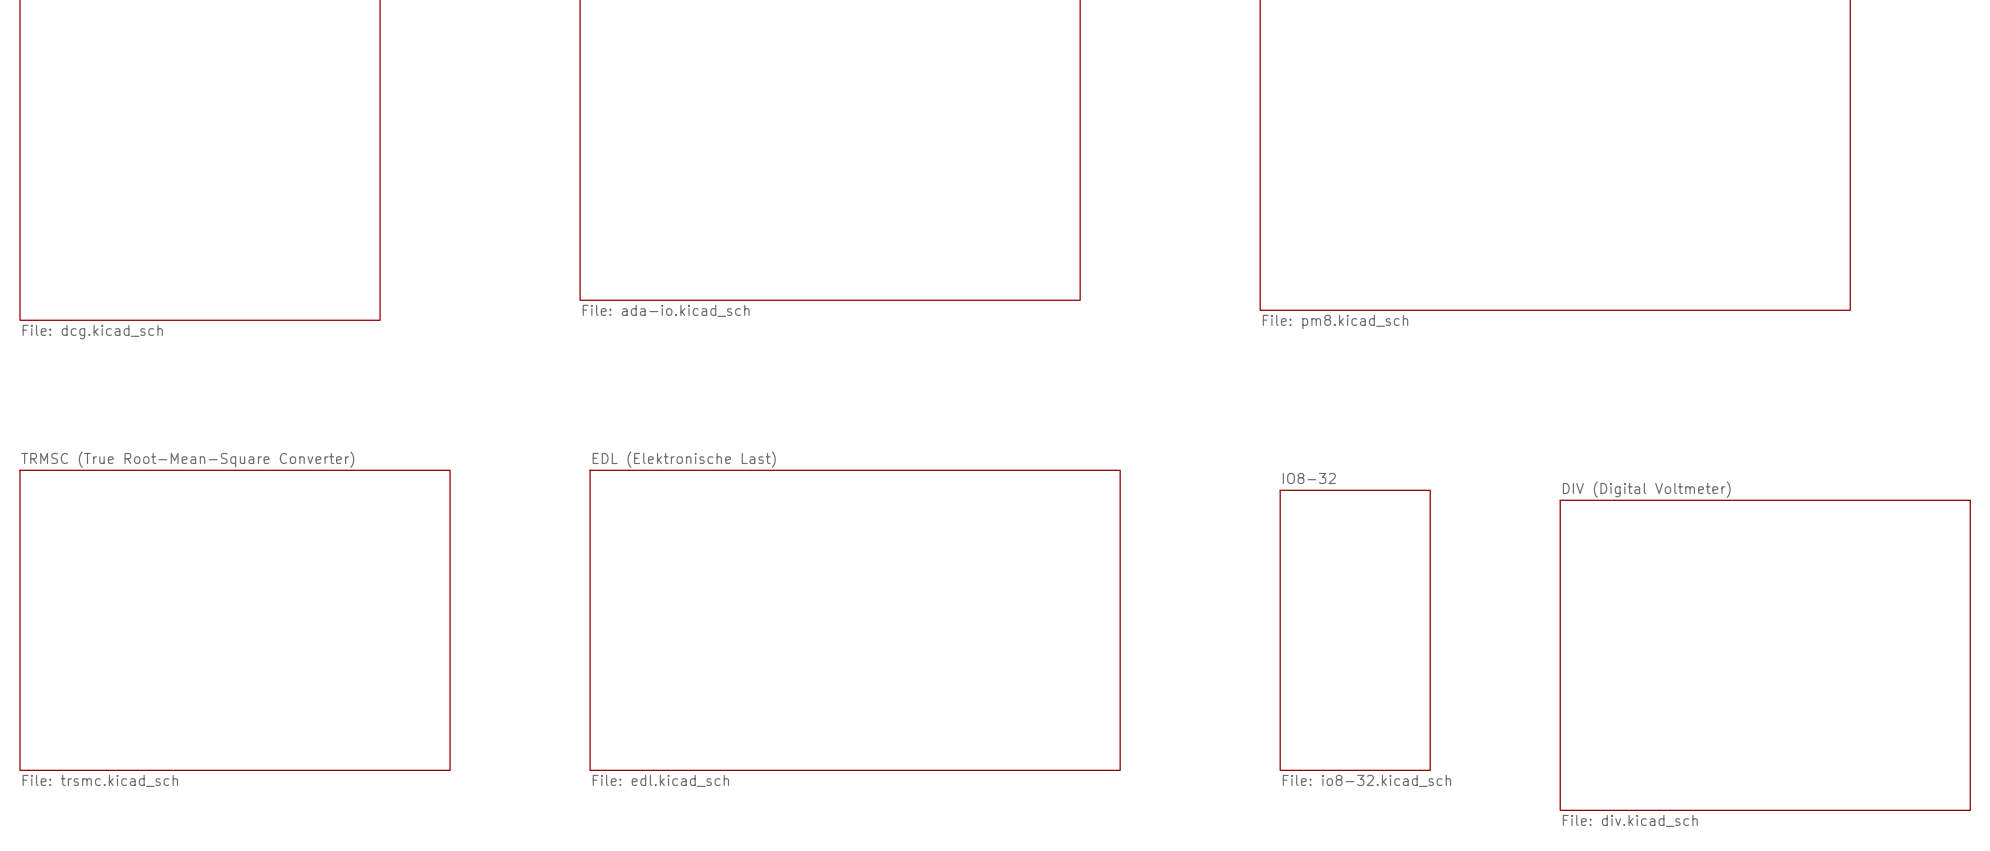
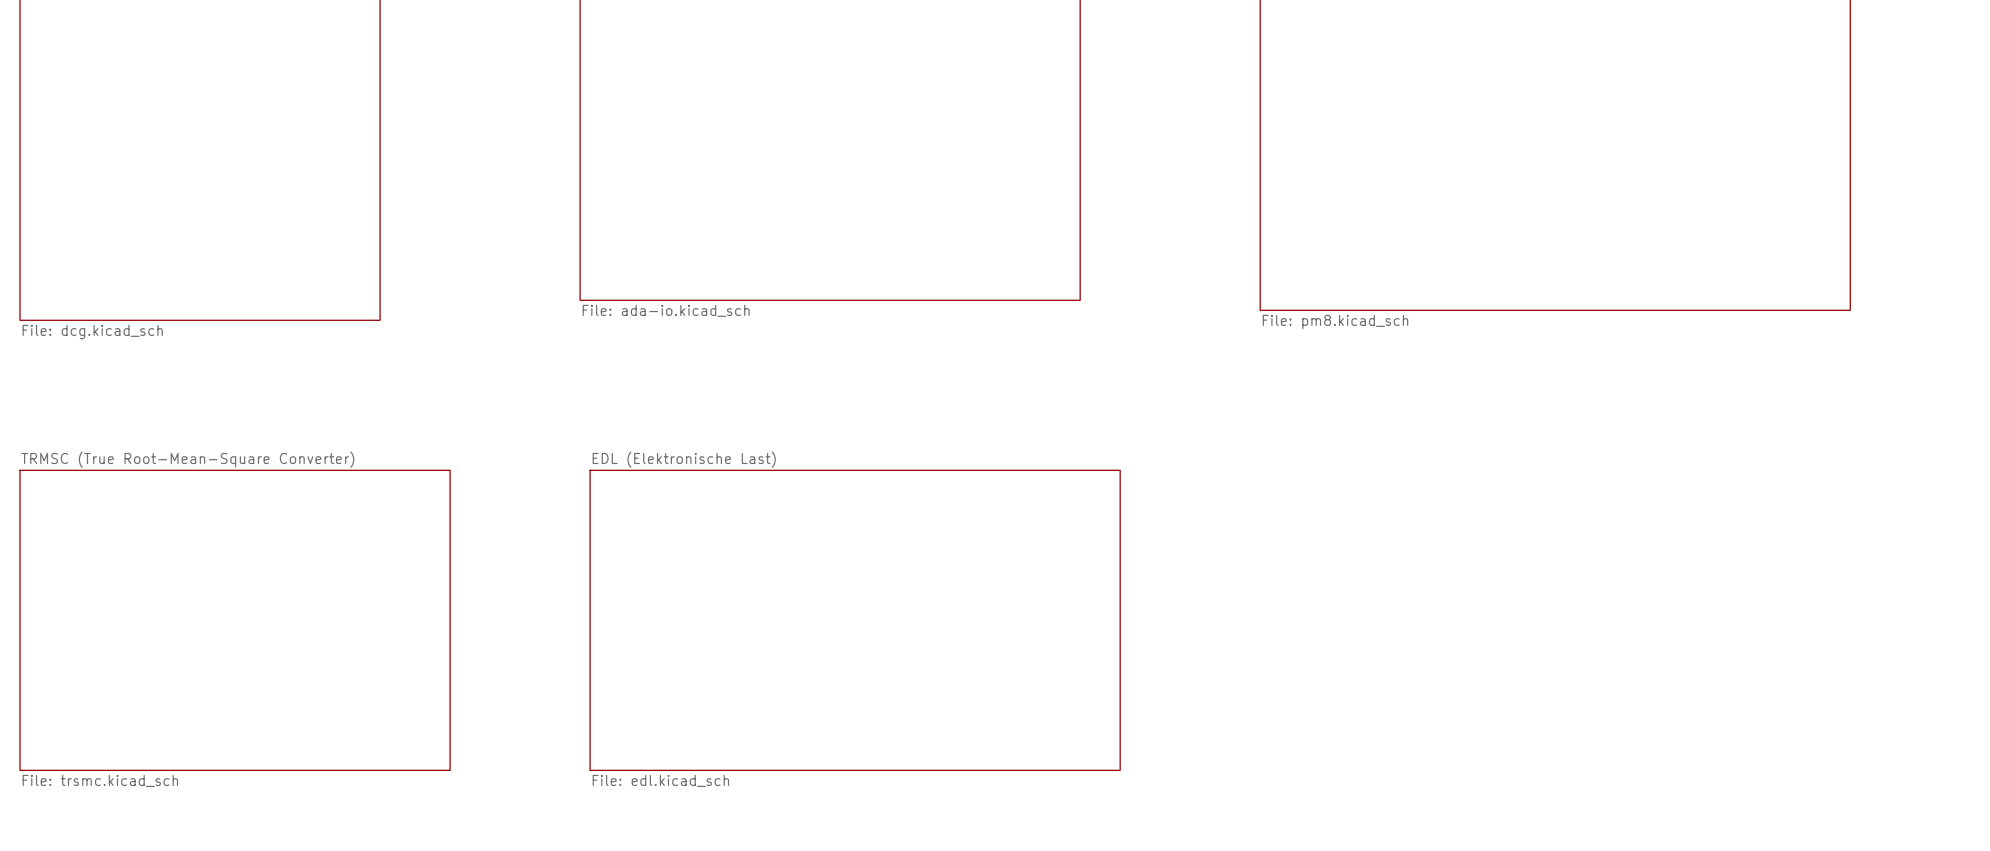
sheet IO8-32: File: io8-32.kicad_sch (1355, 630) -> none
sheet DIV (Digital Voltmeter): File: div.kicad_sch (1765, 655) -> none

